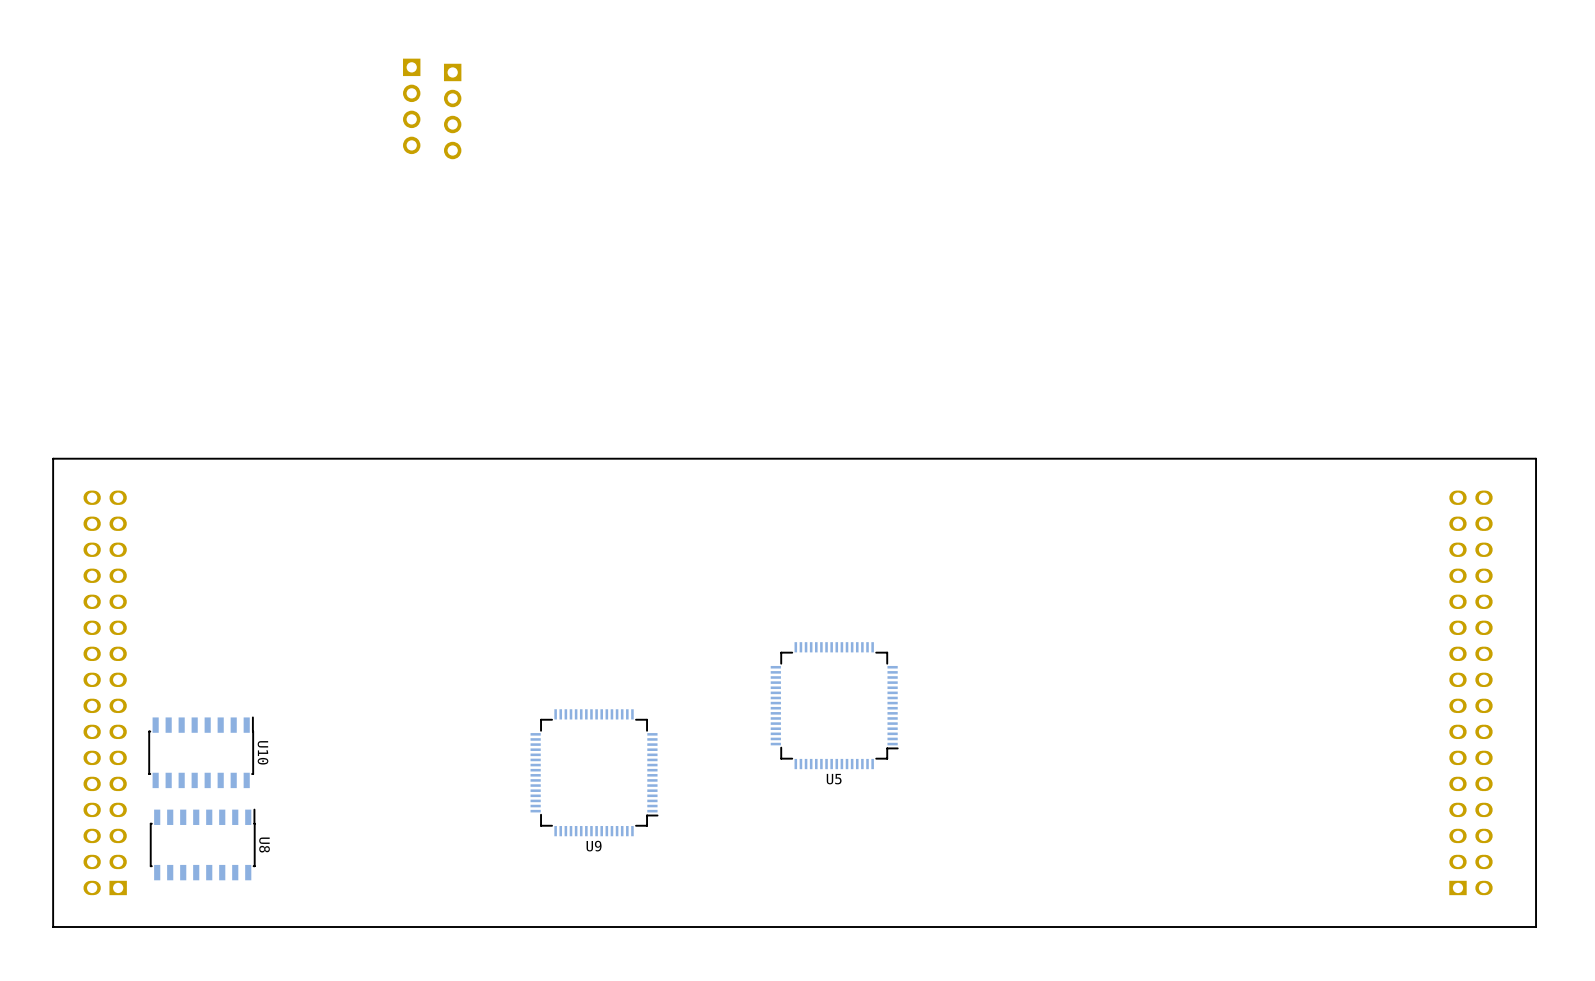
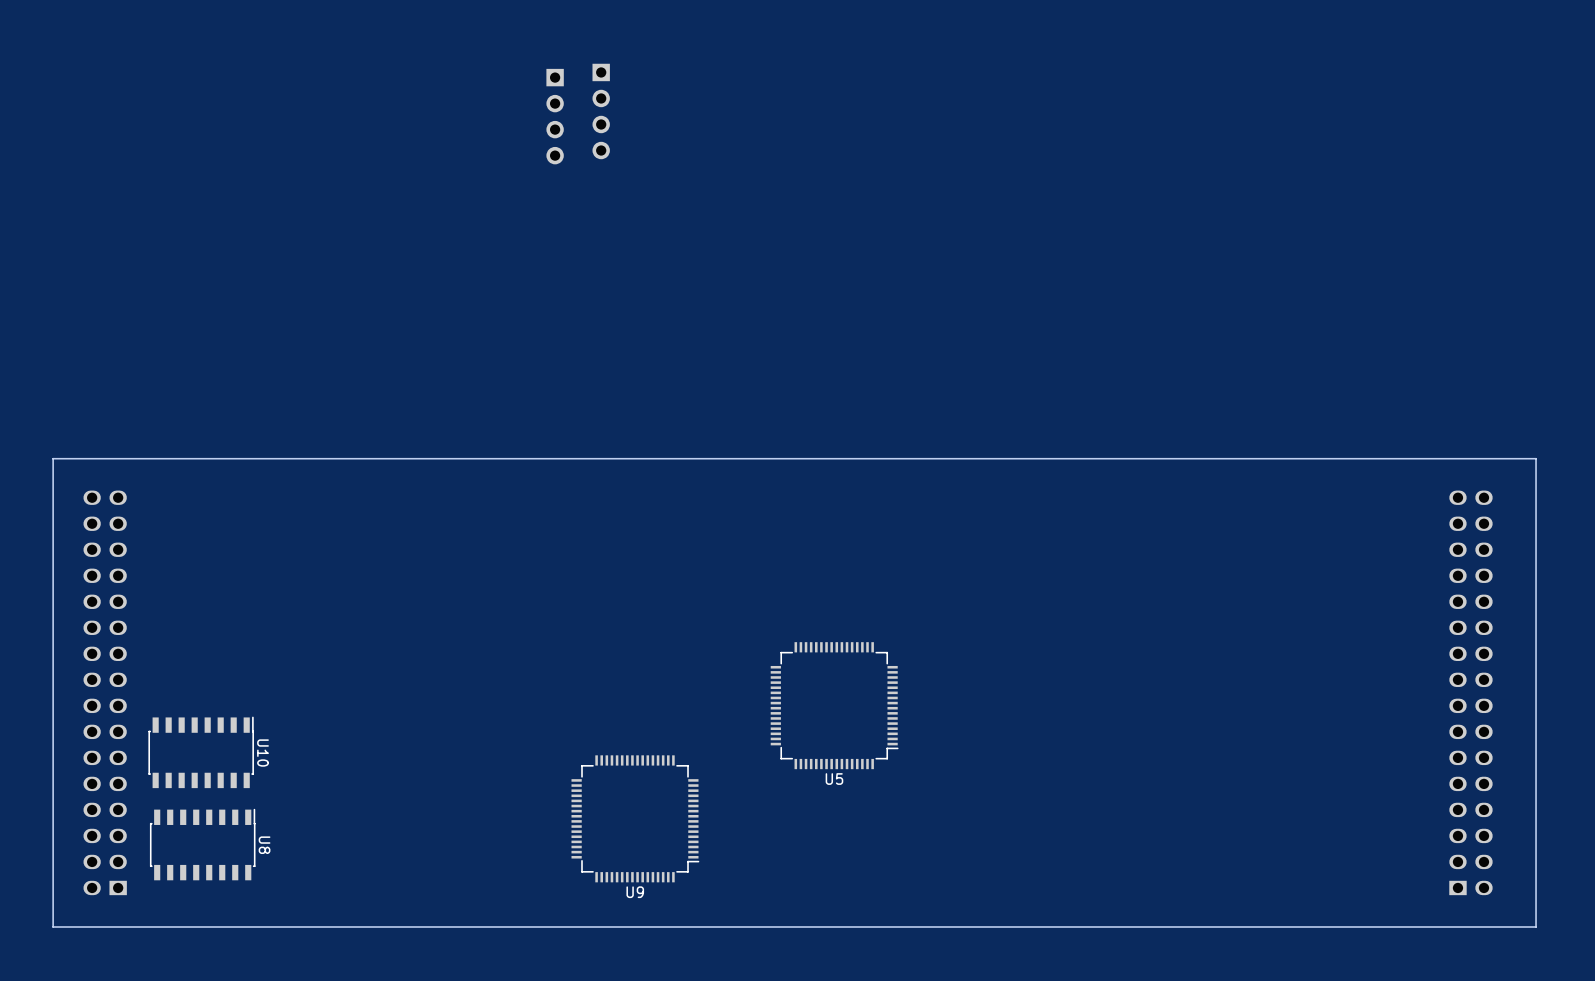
part: (411, 106) -> none
part: (452, 111) -> none
part: none -> (601, 111)
part: none -> (555, 116)
U9 position: (594, 772) -> (635, 818)

